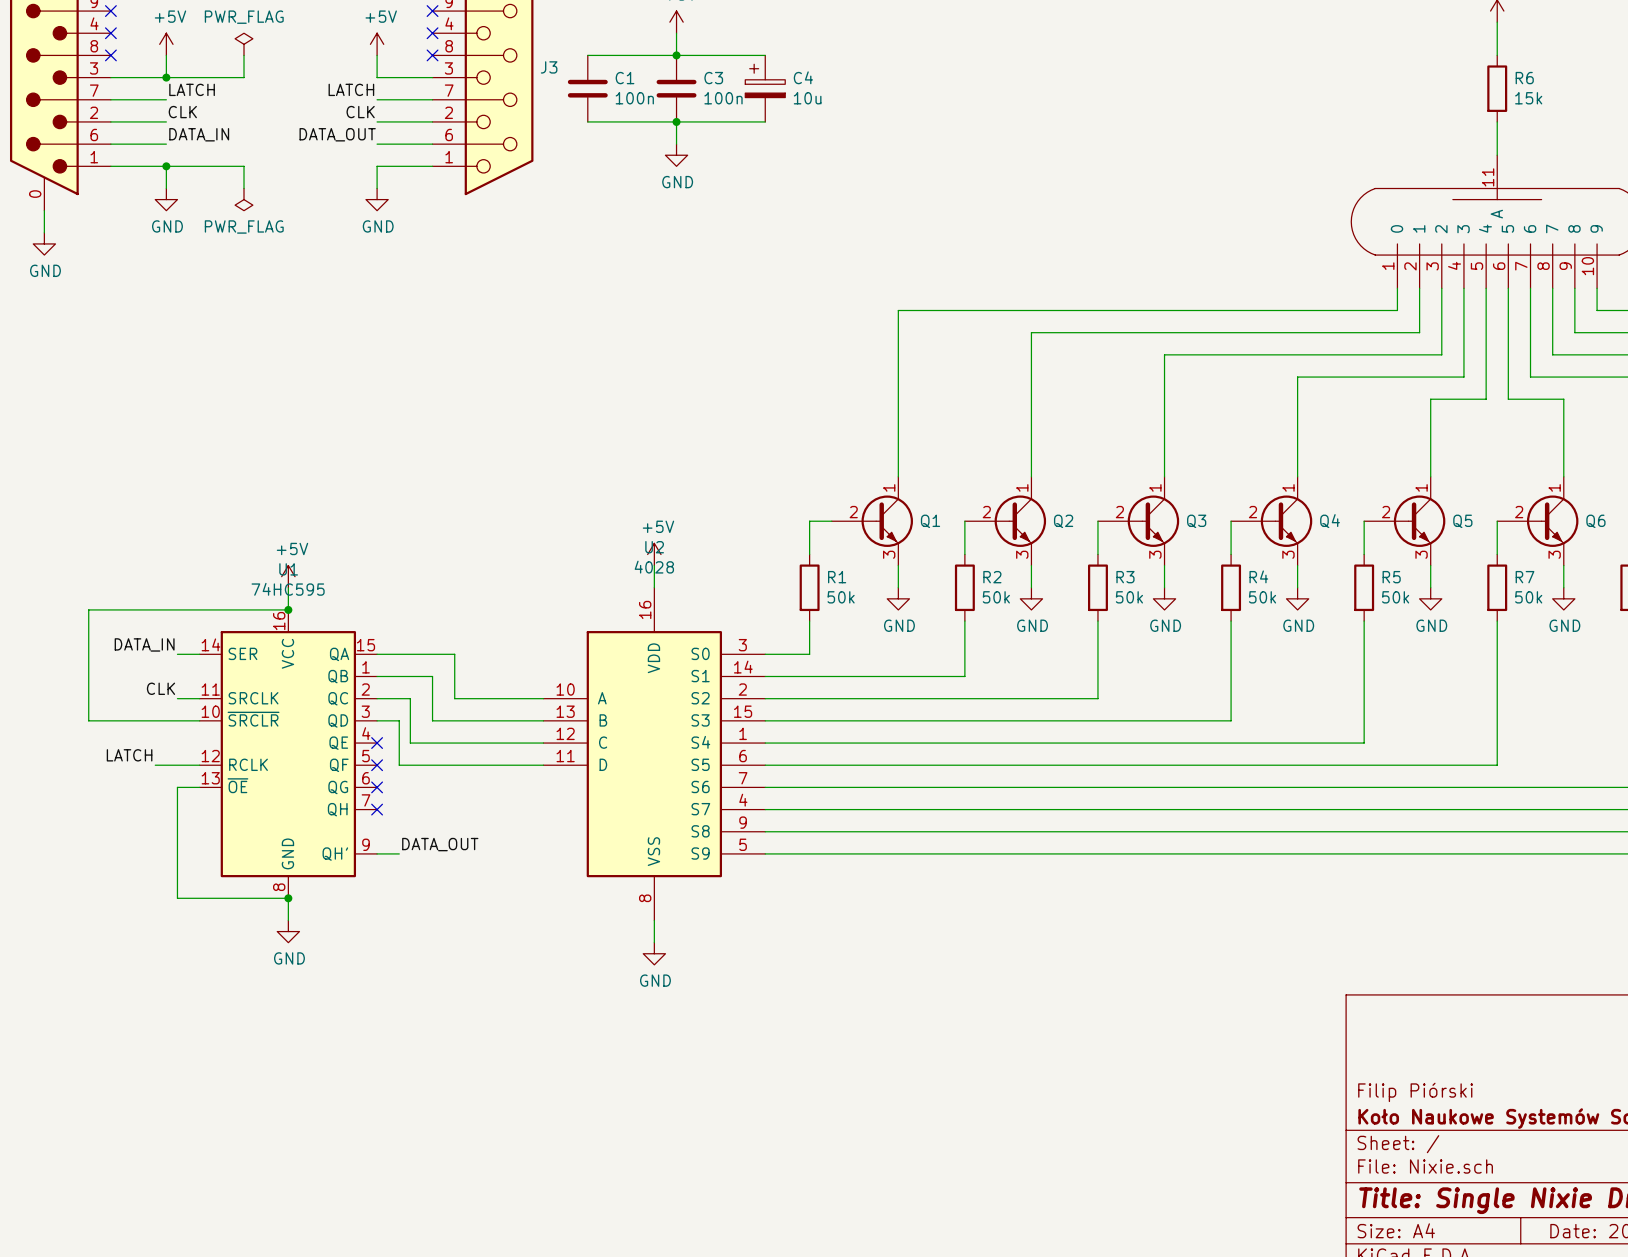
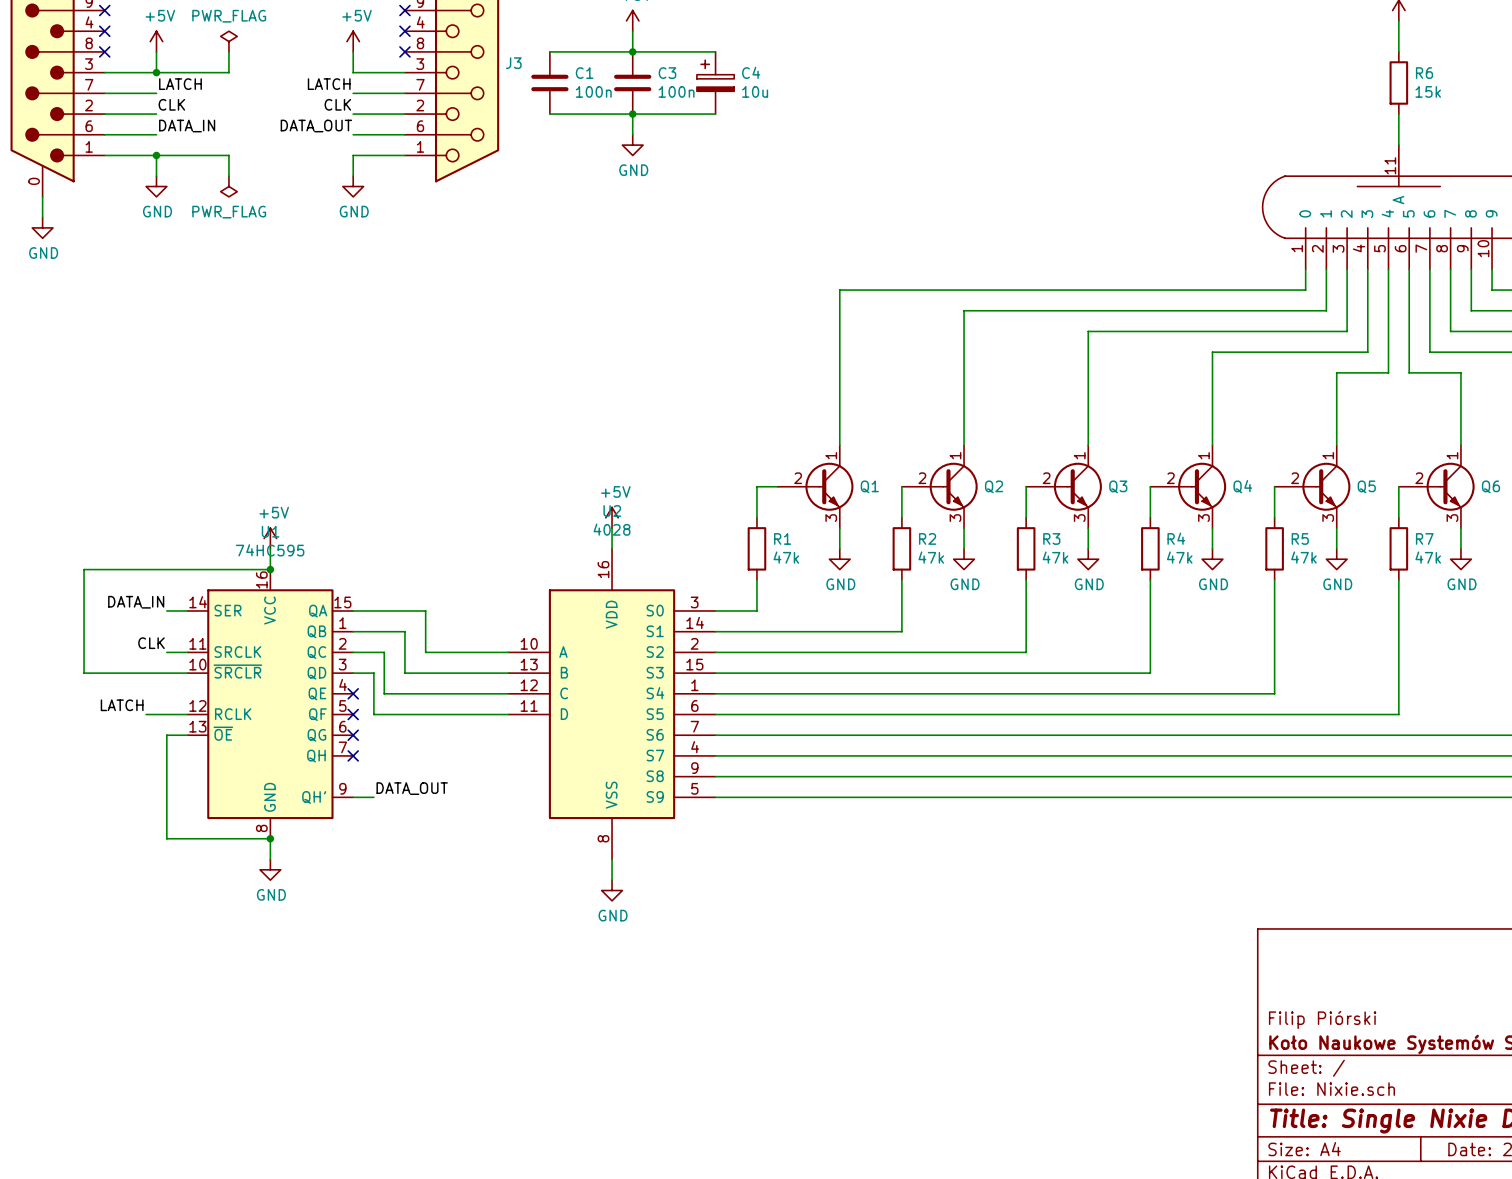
R1 value: 50k (841, 597) -> 47k (786, 557)
R2 value: 50k (996, 597) -> 47k (931, 557)
R3 value: 50k (1129, 597) -> 47k (1055, 557)
R4 value: 50k (1262, 597) -> 47k (1179, 557)
R5 value: 50k (1395, 597) -> 47k (1303, 557)
R7 value: 50k (1528, 597) -> 47k (1428, 557)

